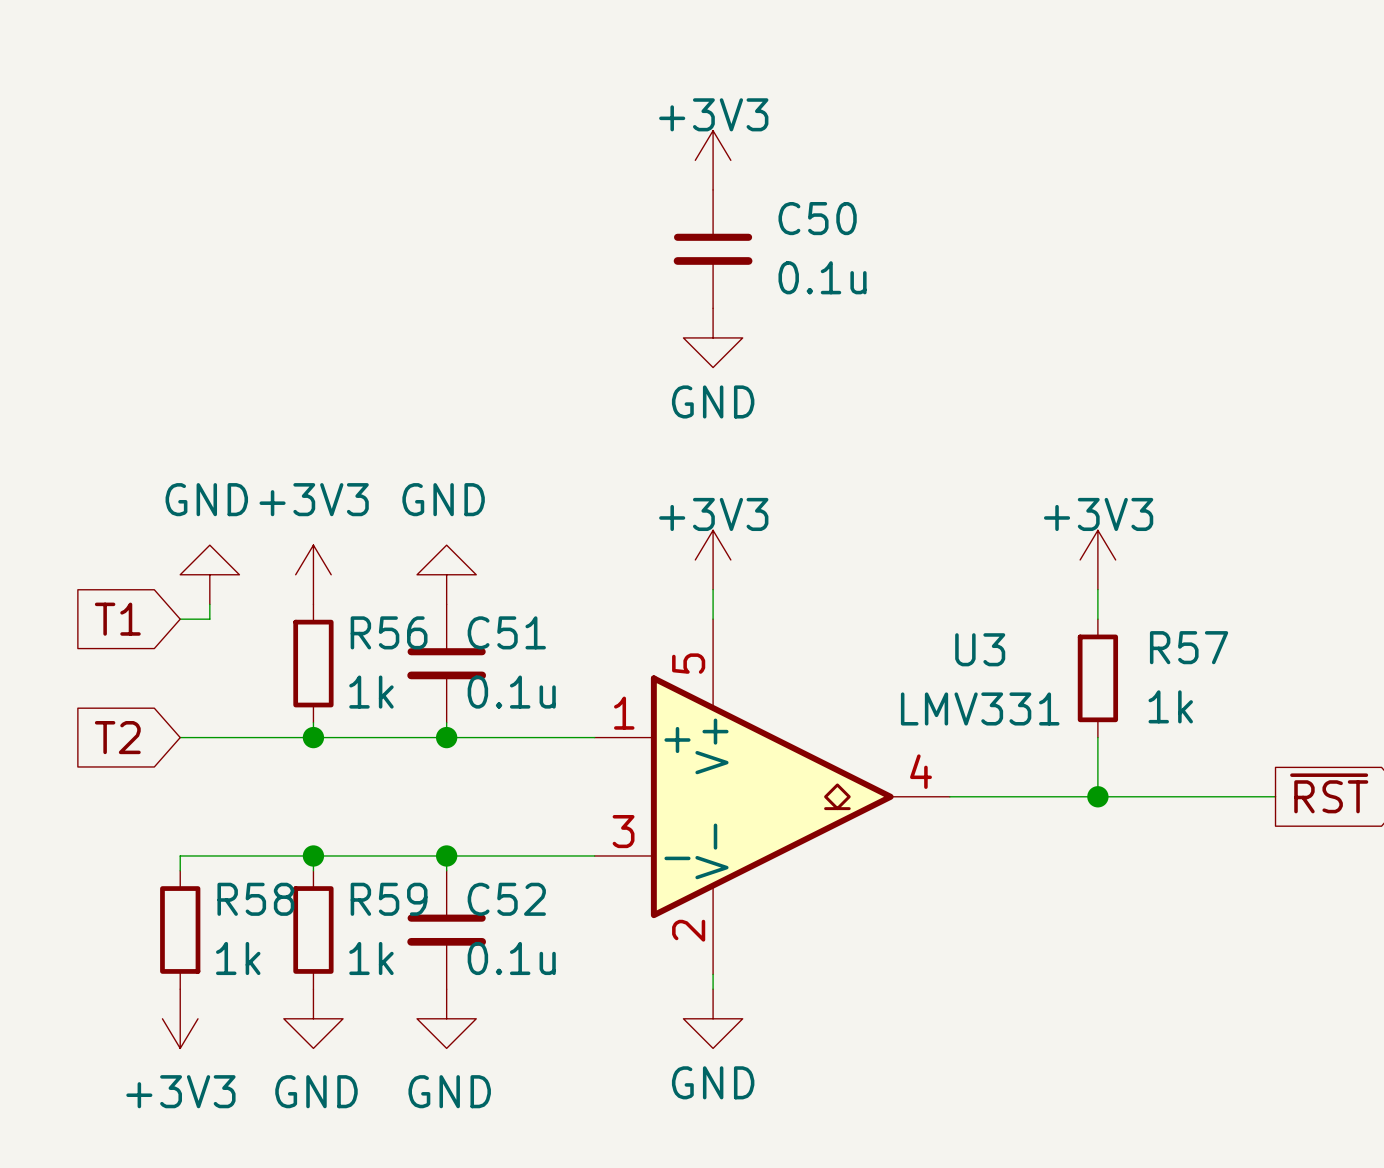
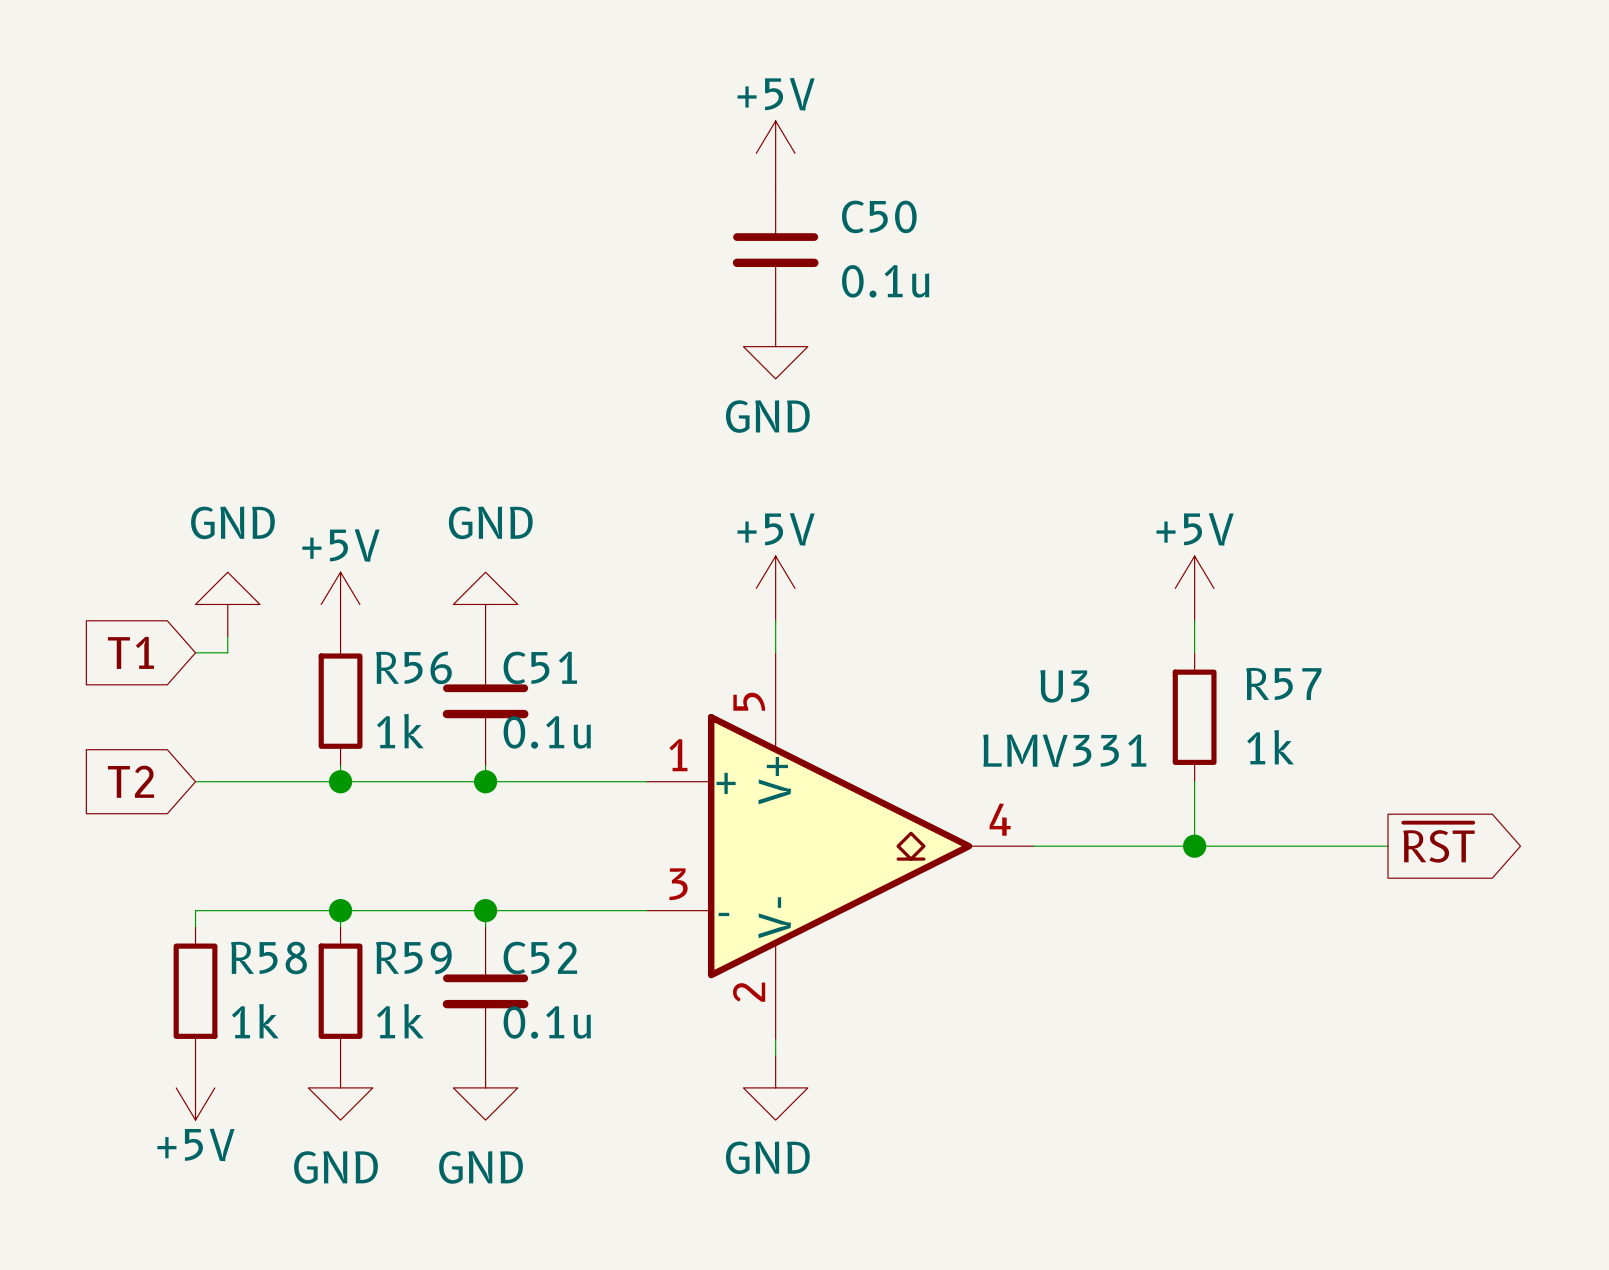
power symbol: +3V3 (713, 160) -> +5V (775, 153)
power symbol: +3V3 (713, 559) -> +5V (775, 588)
power symbol: +3V3 (1097, 559) -> +5V (1194, 588)
power symbol: +3V3 (313, 574) -> +5V (340, 604)
power symbol: +3V3 (180, 1018) -> +5V (195, 1087)

